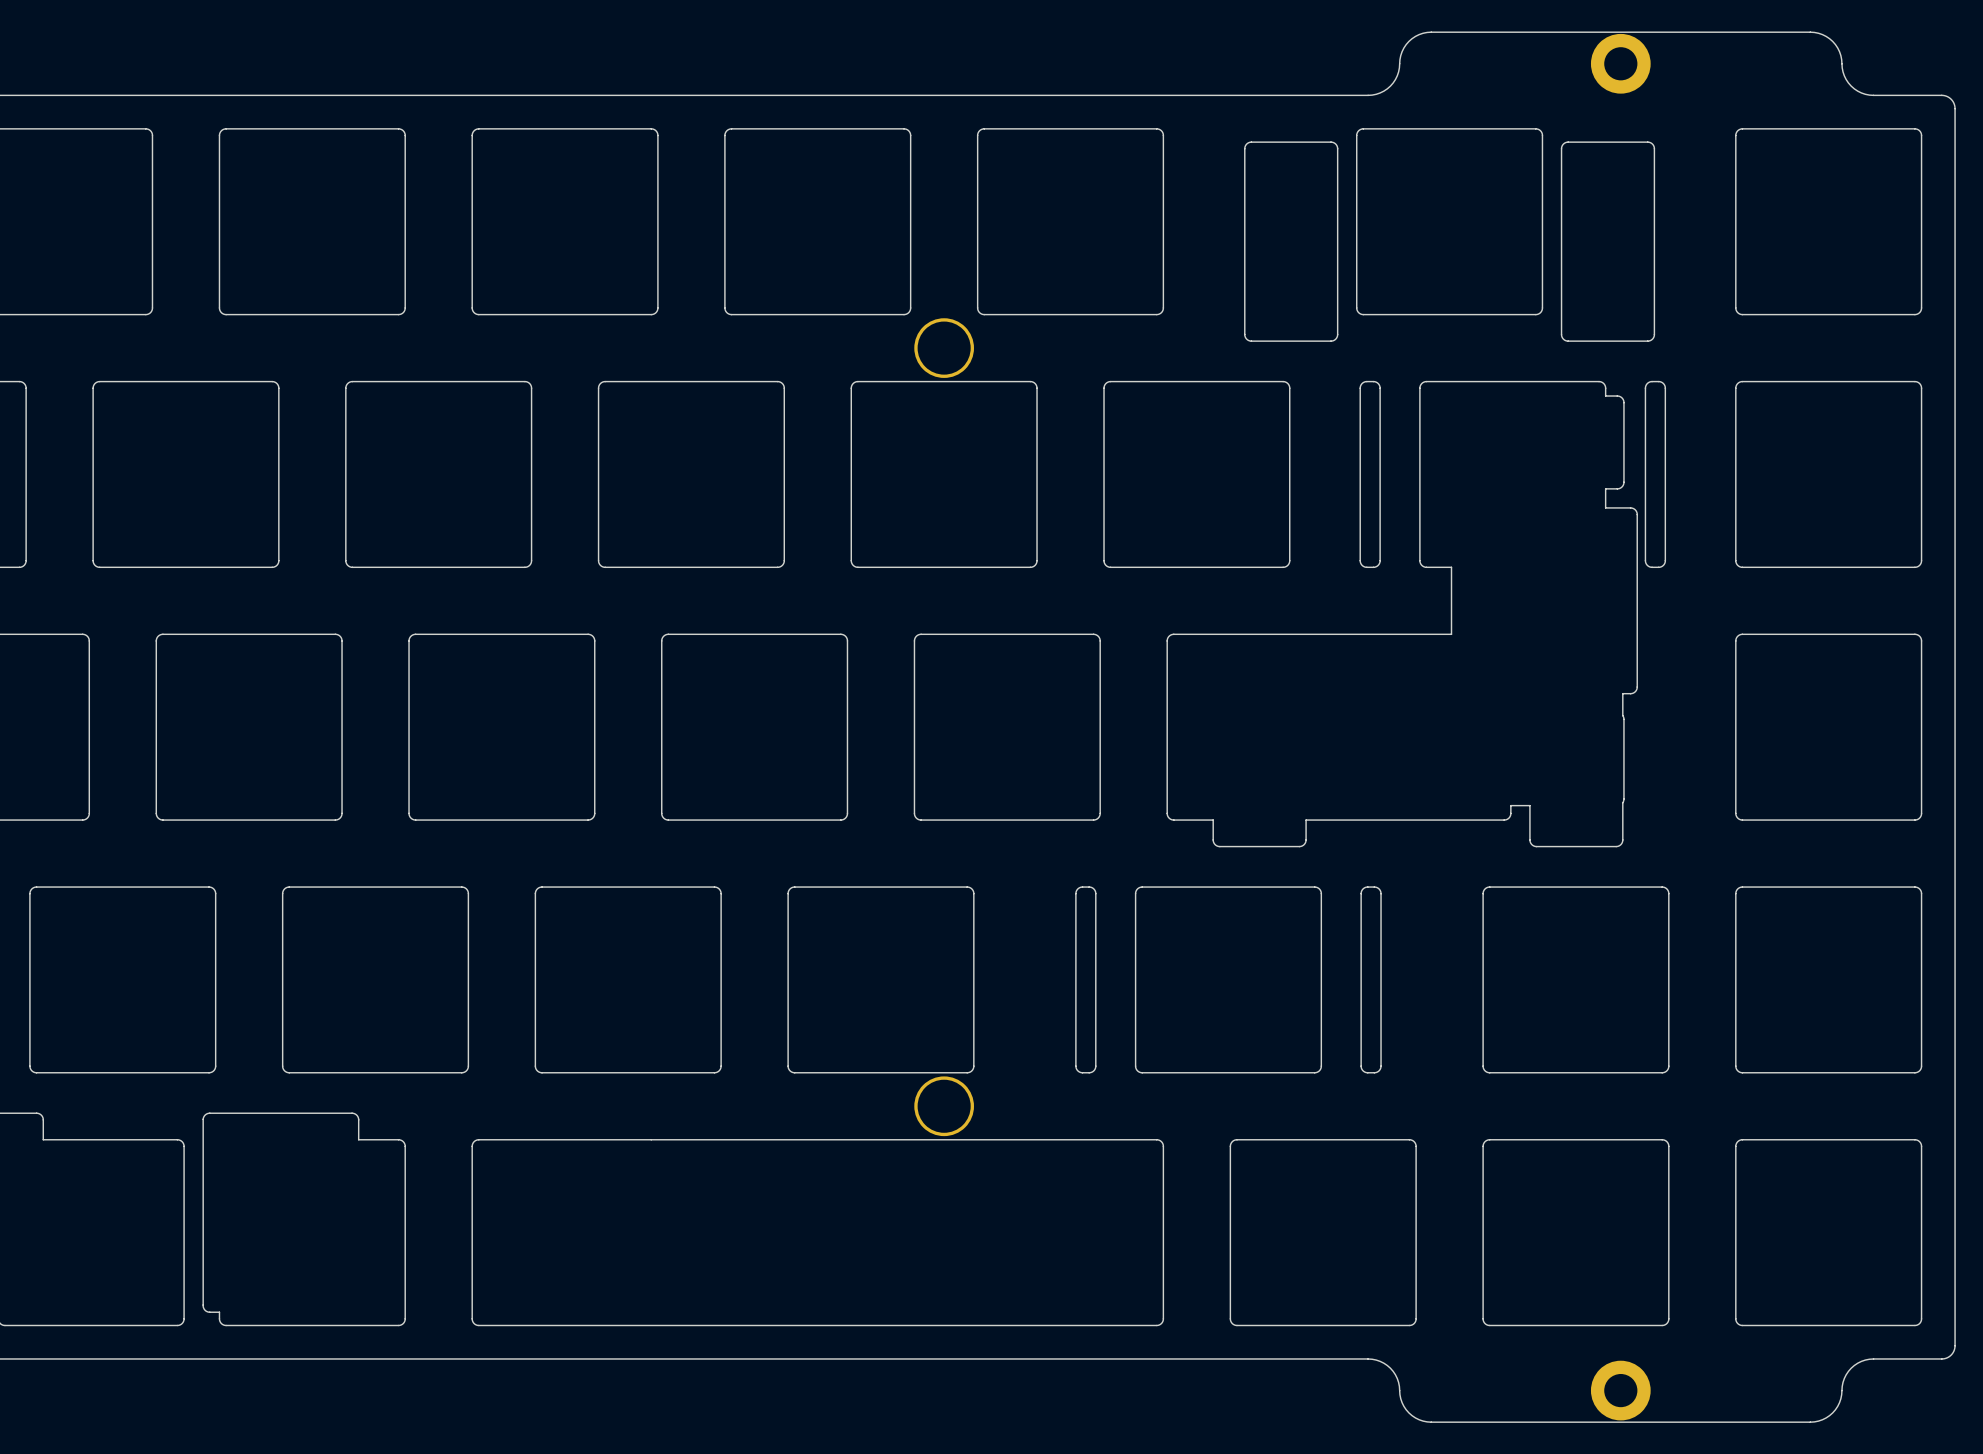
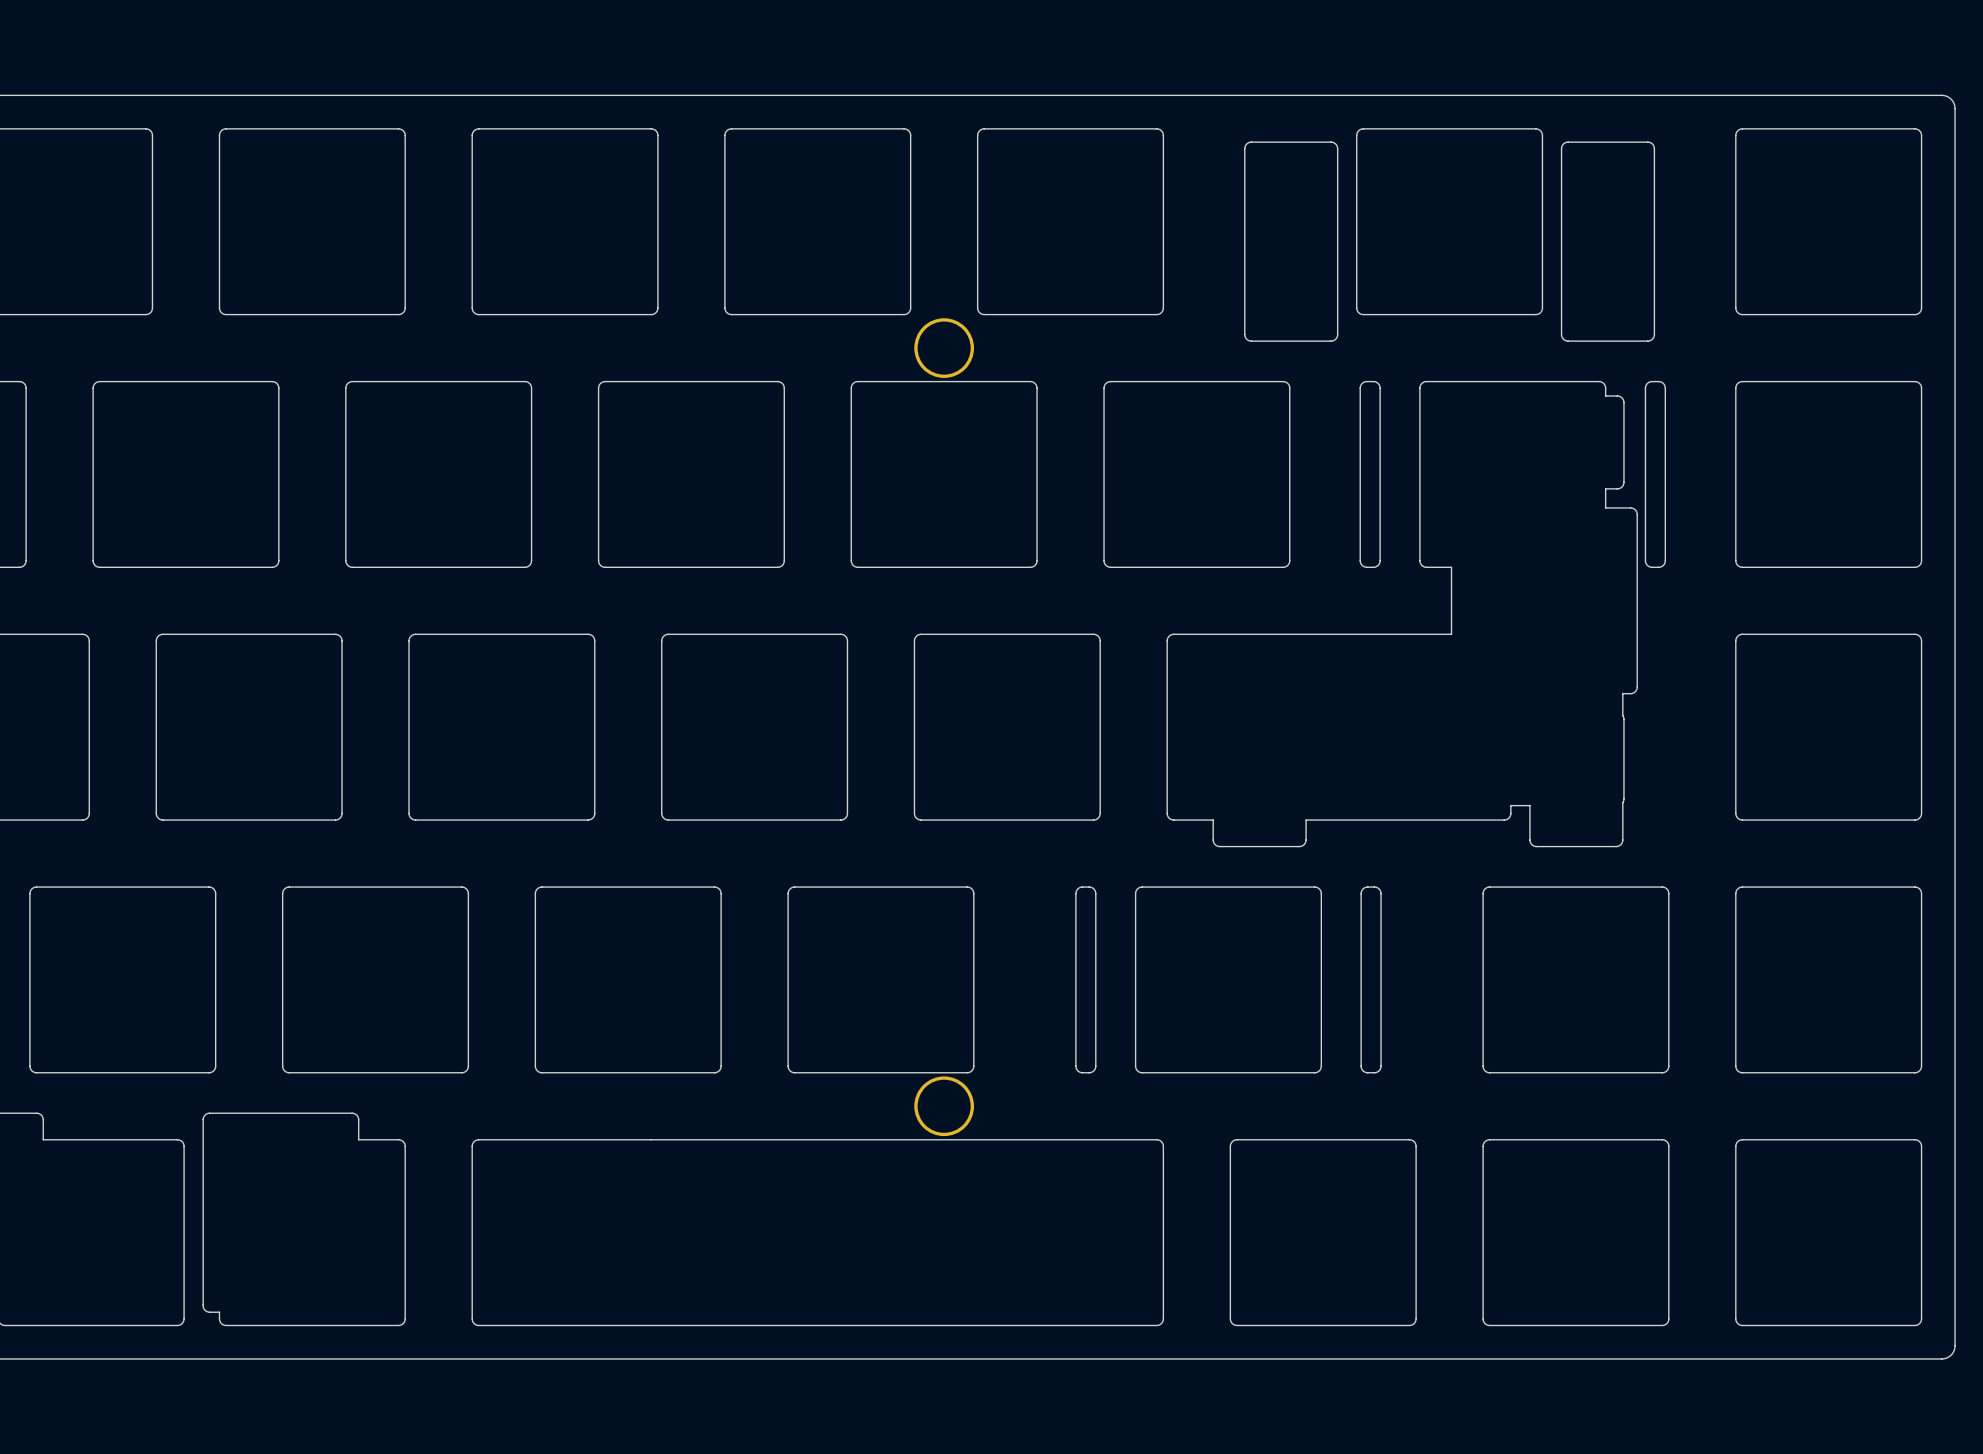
part: (1620, 63) -> none
board edge: (1368, 95) (1380, 92) (1390, 86) (1397, 75) (1400, 55) (1406, 44) (1415, 36) (1431, 32) (1814, 32) (1826, 36) (1835, 44) (1840, 55) (1844, 75) (1851, 86) (1861, 92) (1873, 95) -> (1368, 95) (1873, 95)
board edge: (1368, 1358) (1380, 1361) (1390, 1368) (1397, 1378) (1400, 1398) (1406, 1409) (1419, 1419) (1431, 1422) (1814, 1421) (1826, 1417) (1835, 1409) (1840, 1398) (1844, 1378) (1851, 1368) (1861, 1361) (1873, 1358) -> (1368, 1358) (1873, 1358)
part: (1620, 1390) -> none

